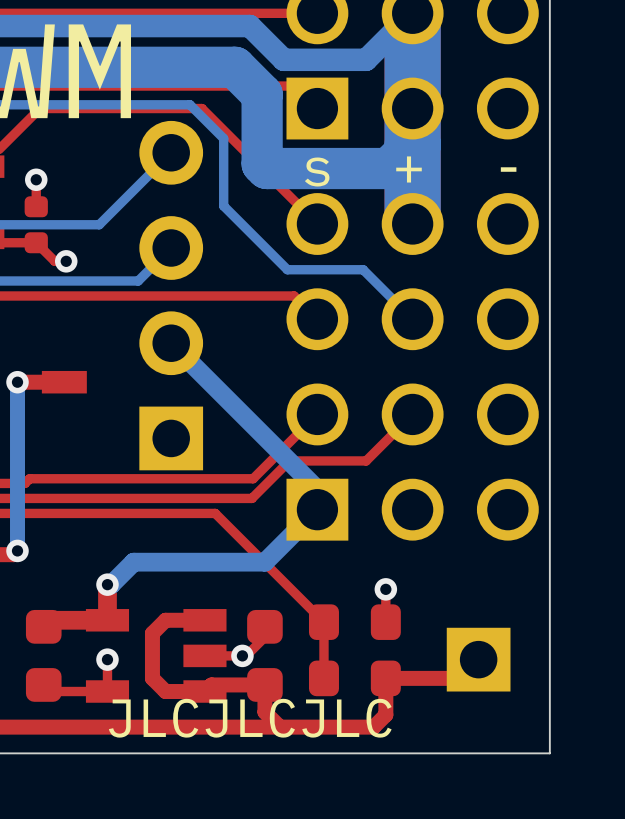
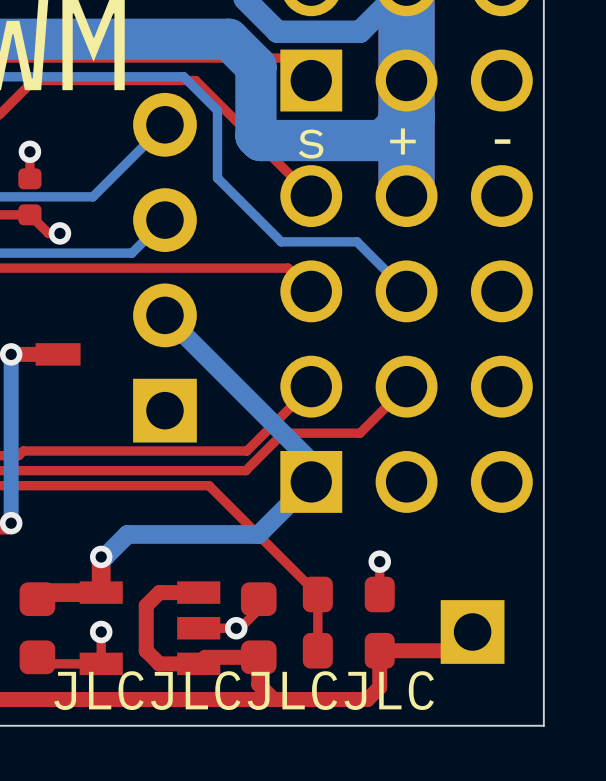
text: JLCJLCJLC (250, 718) -> JLCJLCJLCJLC (244, 690)

